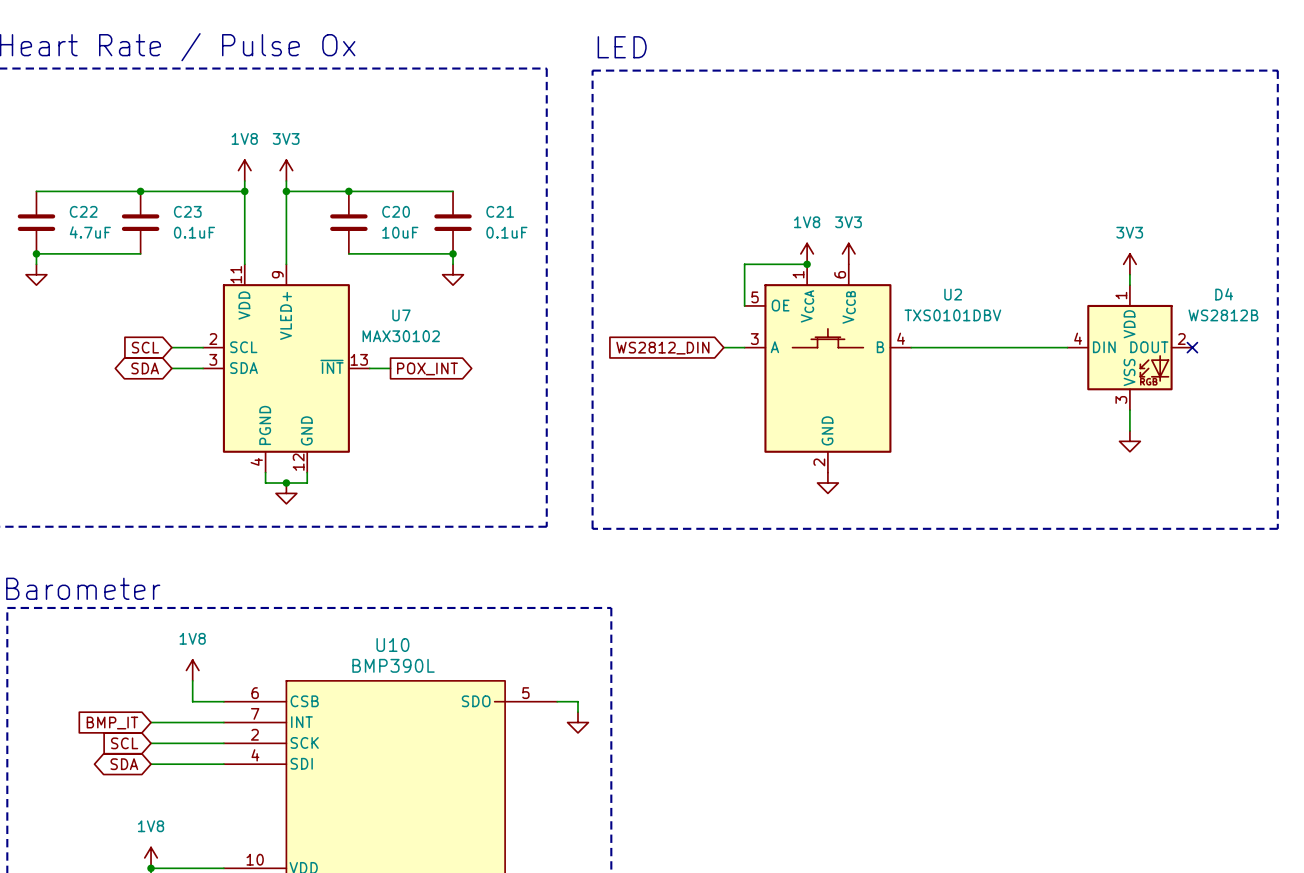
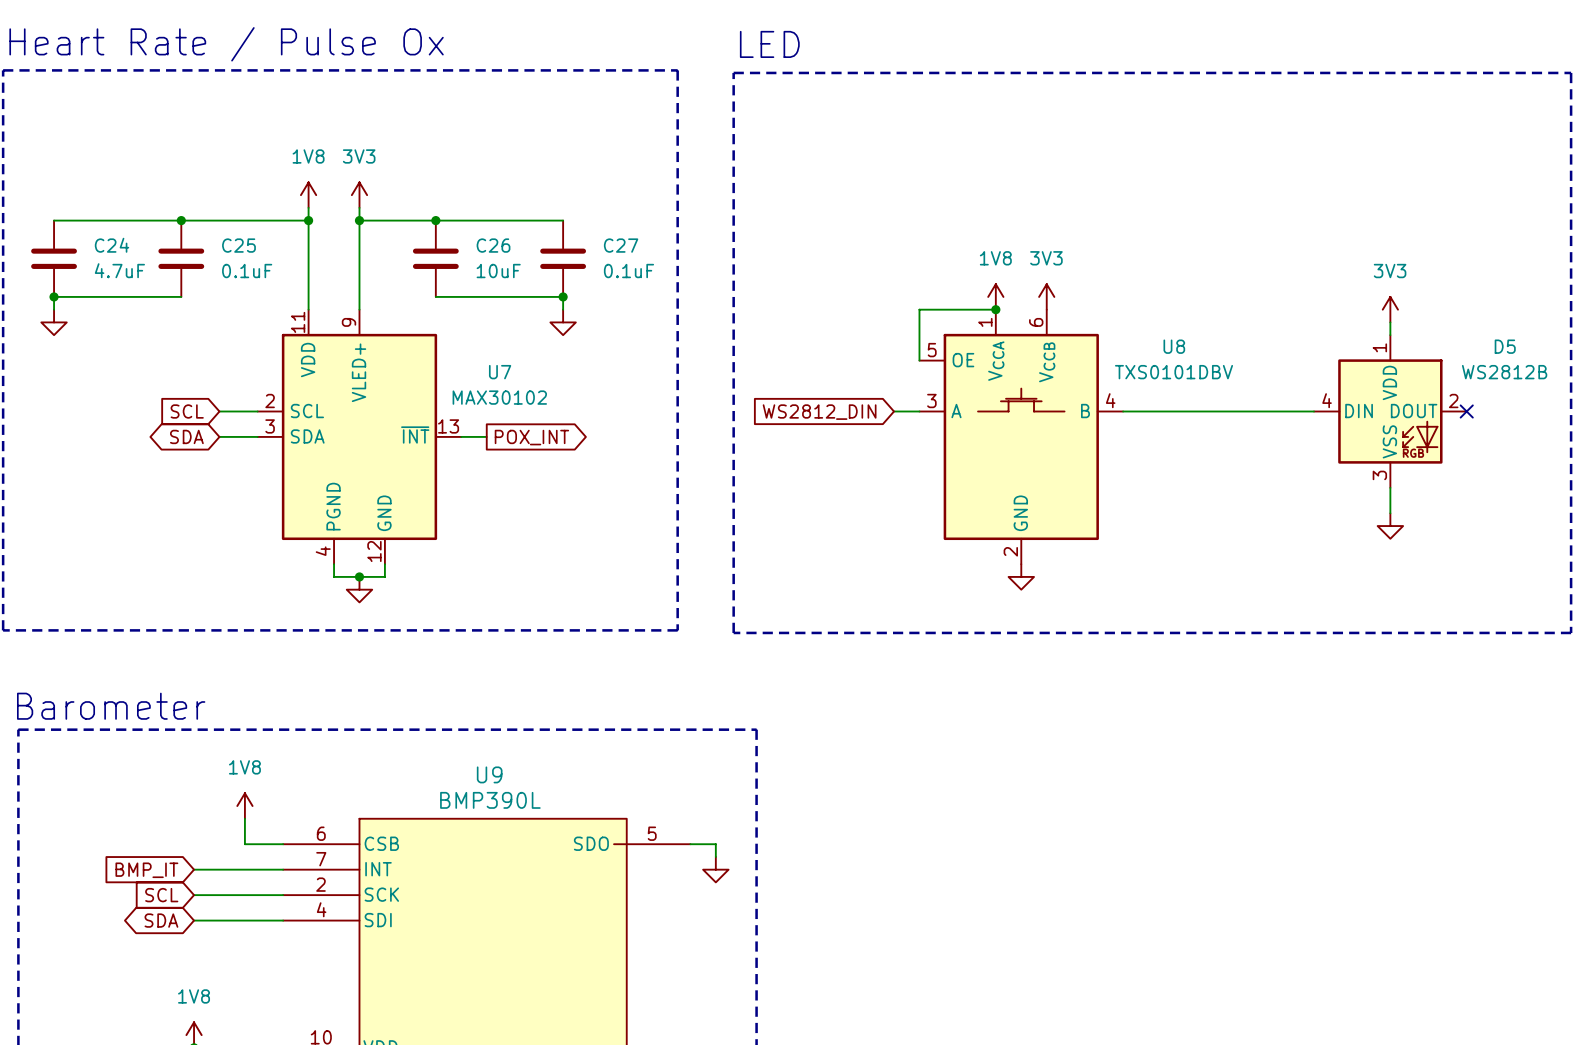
C22 name: C22 (83, 211) -> C24 (112, 245)
C23 name: C23 (187, 211) -> C25 (238, 245)
C20 name: C20 (396, 211) -> C26 (493, 245)
C21 name: C21 (500, 211) -> C27 (621, 245)
U2 name: U2 (953, 294) -> U8 (1174, 346)
D4 name: D4 (1224, 294) -> D5 (1505, 346)
U10 name: U10 (392, 644) -> U9 (489, 774)

